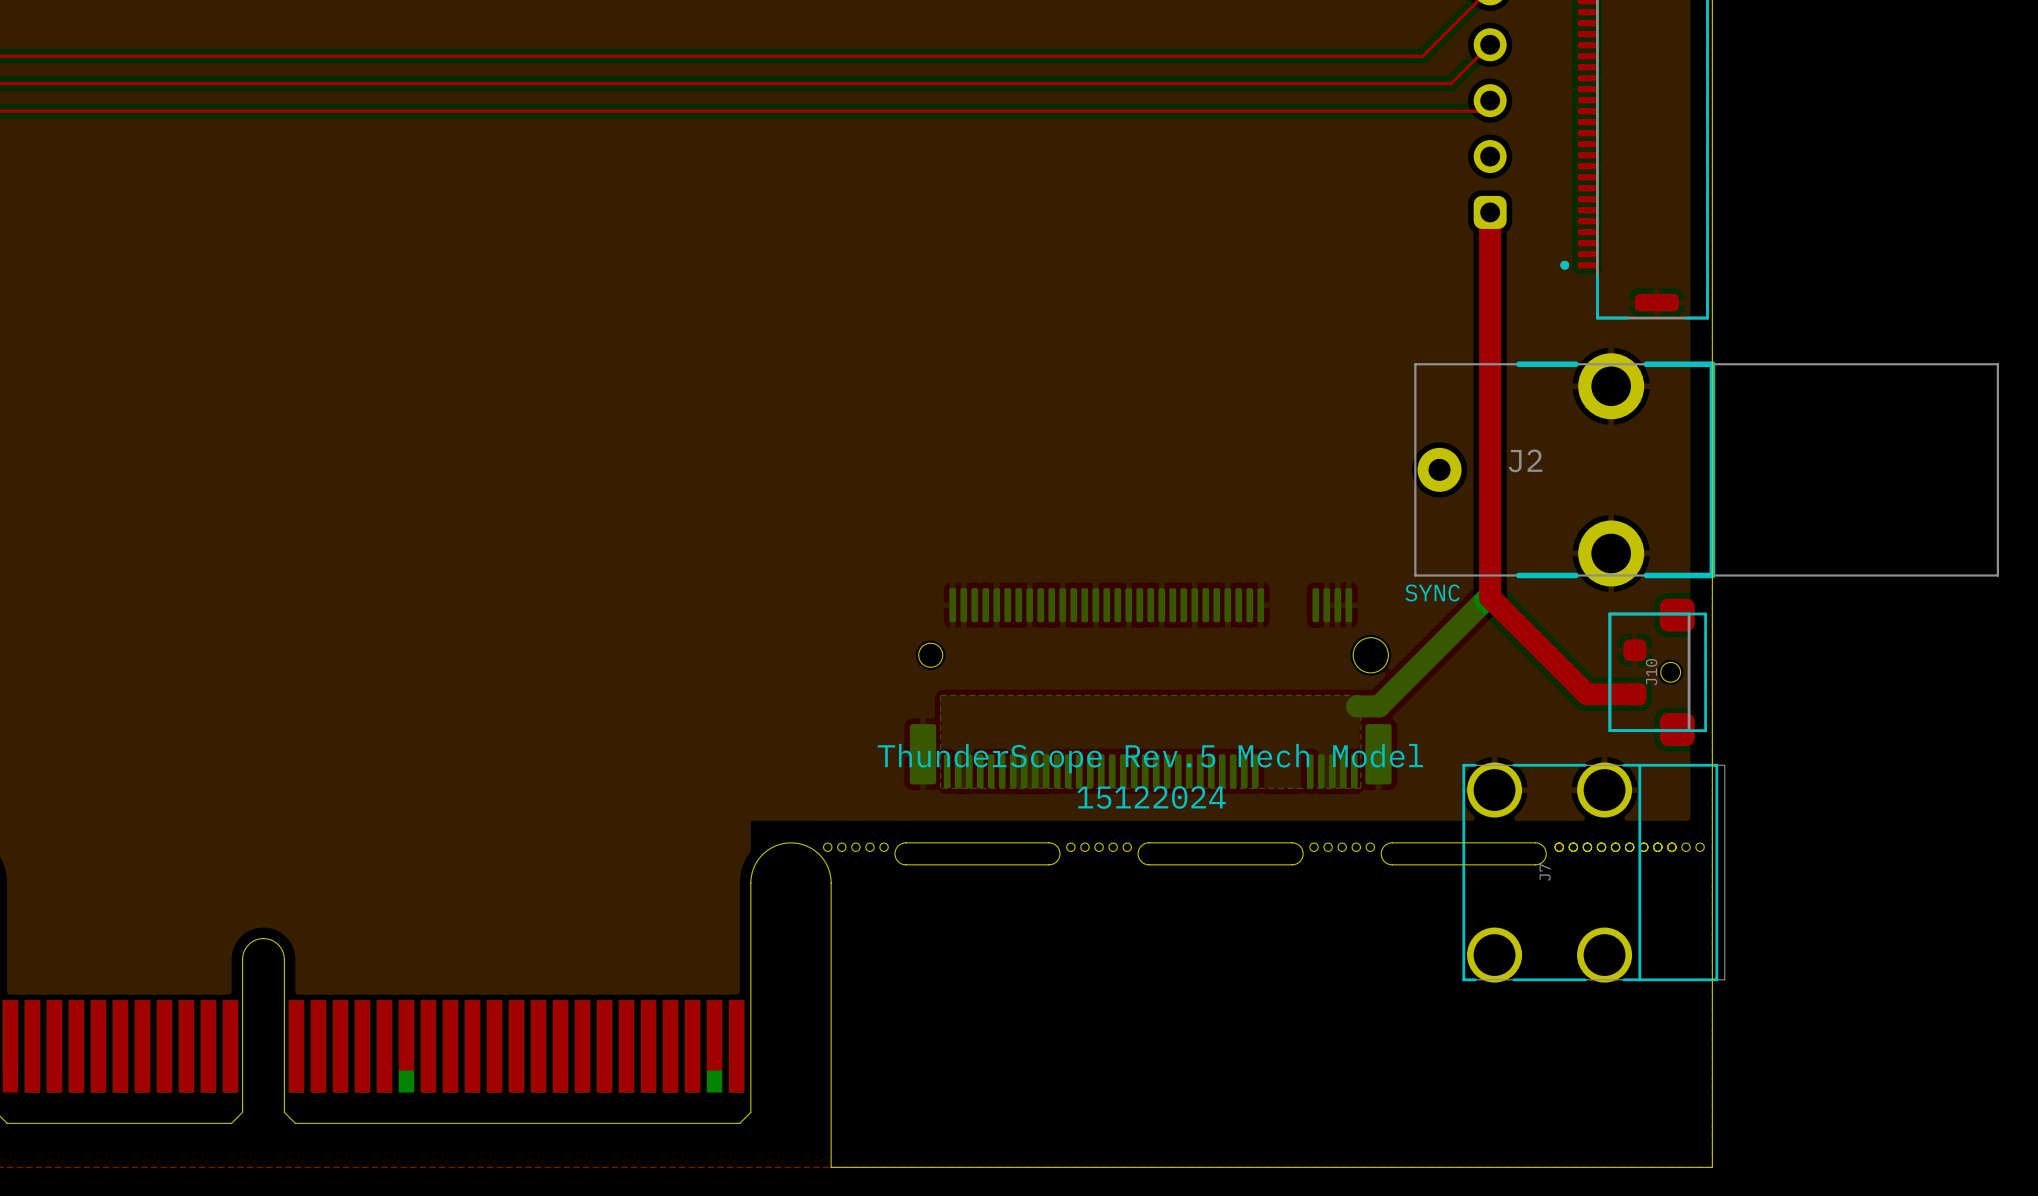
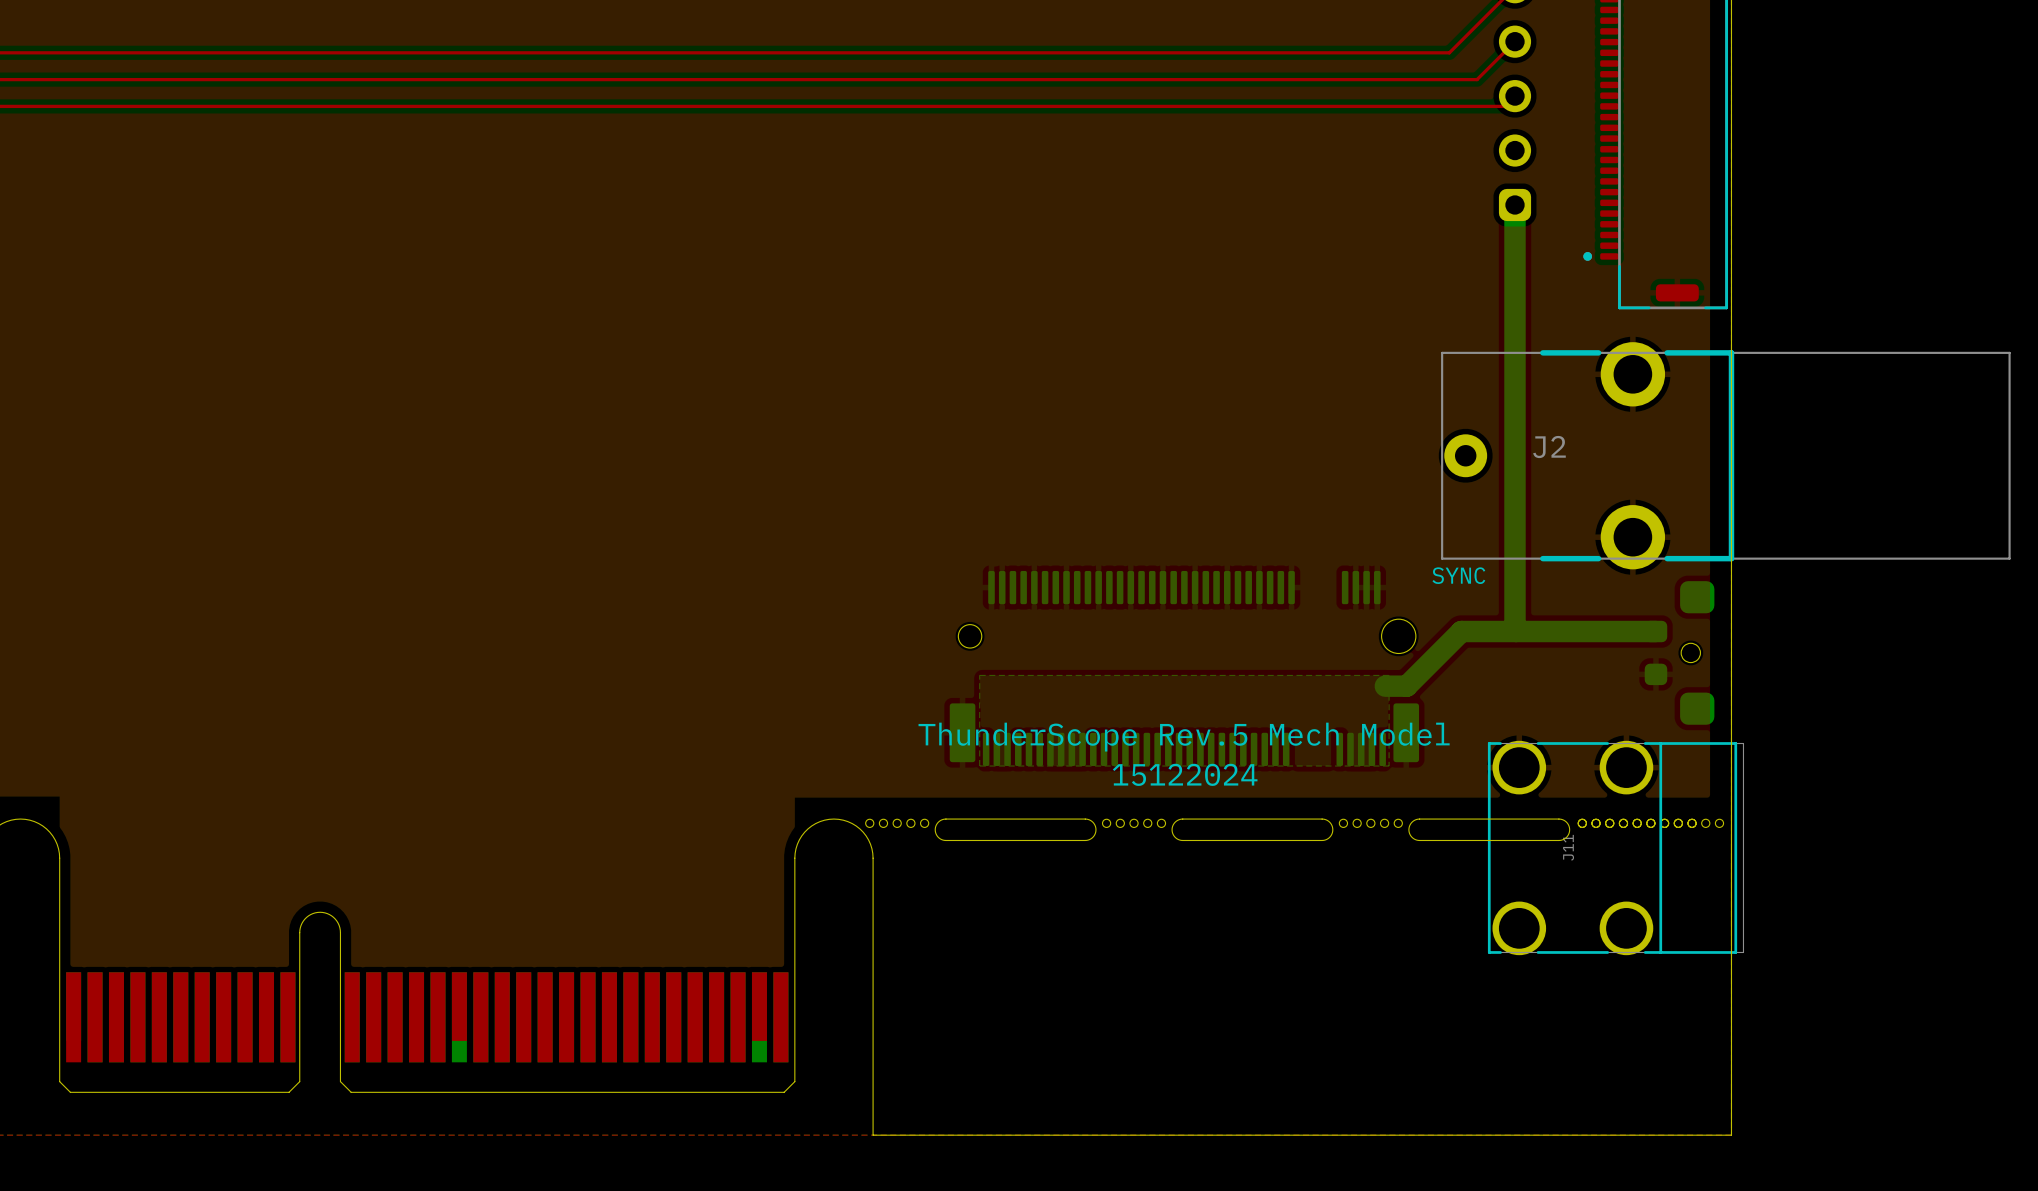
top track: (1490, 212) (1490, 597) (1586, 694) (1634, 694) -> none
bottom track: (1490, 595) (1435, 650) -> (1515, 577) (1516, 631)
bottom track: none -> (1461, 631) (1655, 631)
J10 side: top (1657, 672) -> bottom (1679, 652)
J7 name: J7 (1545, 872) -> J11 (1568, 847)

